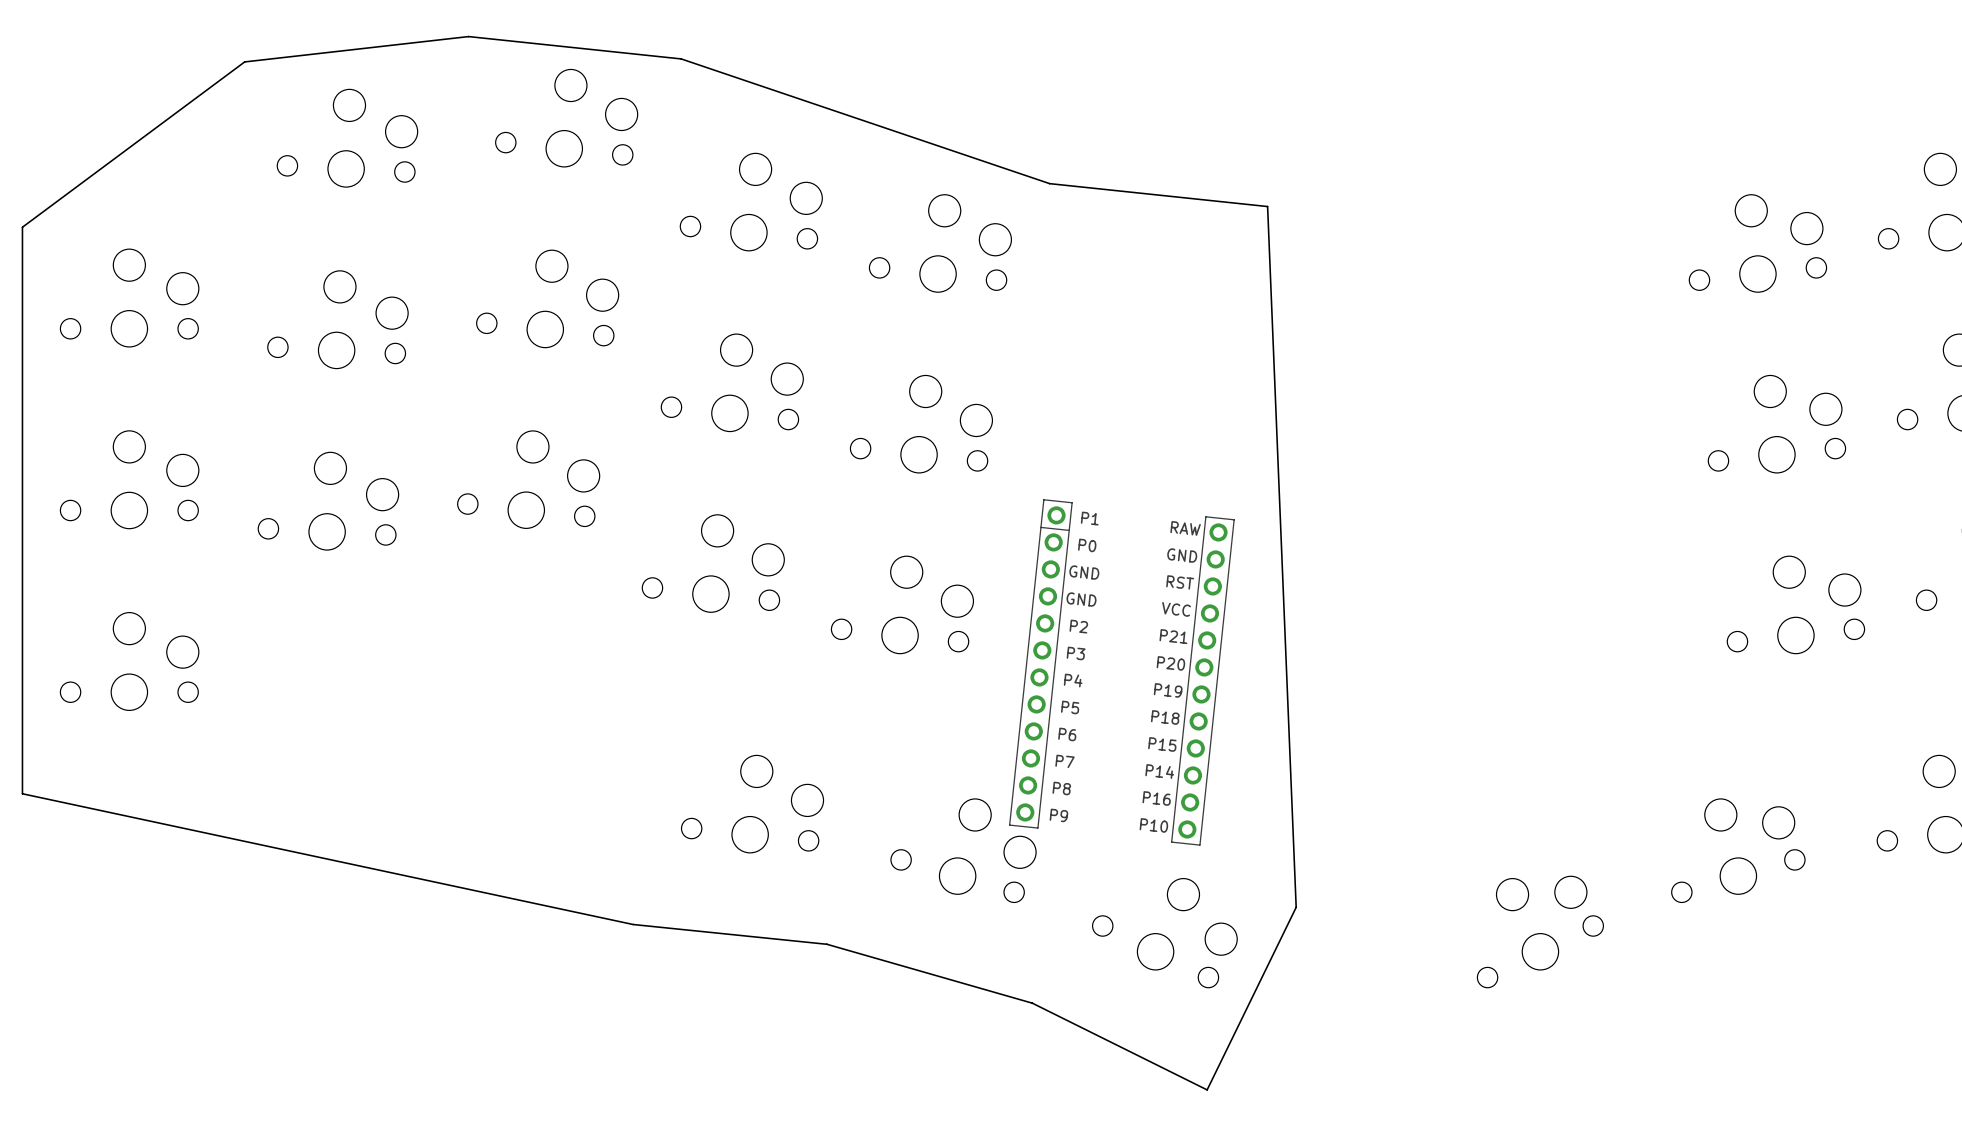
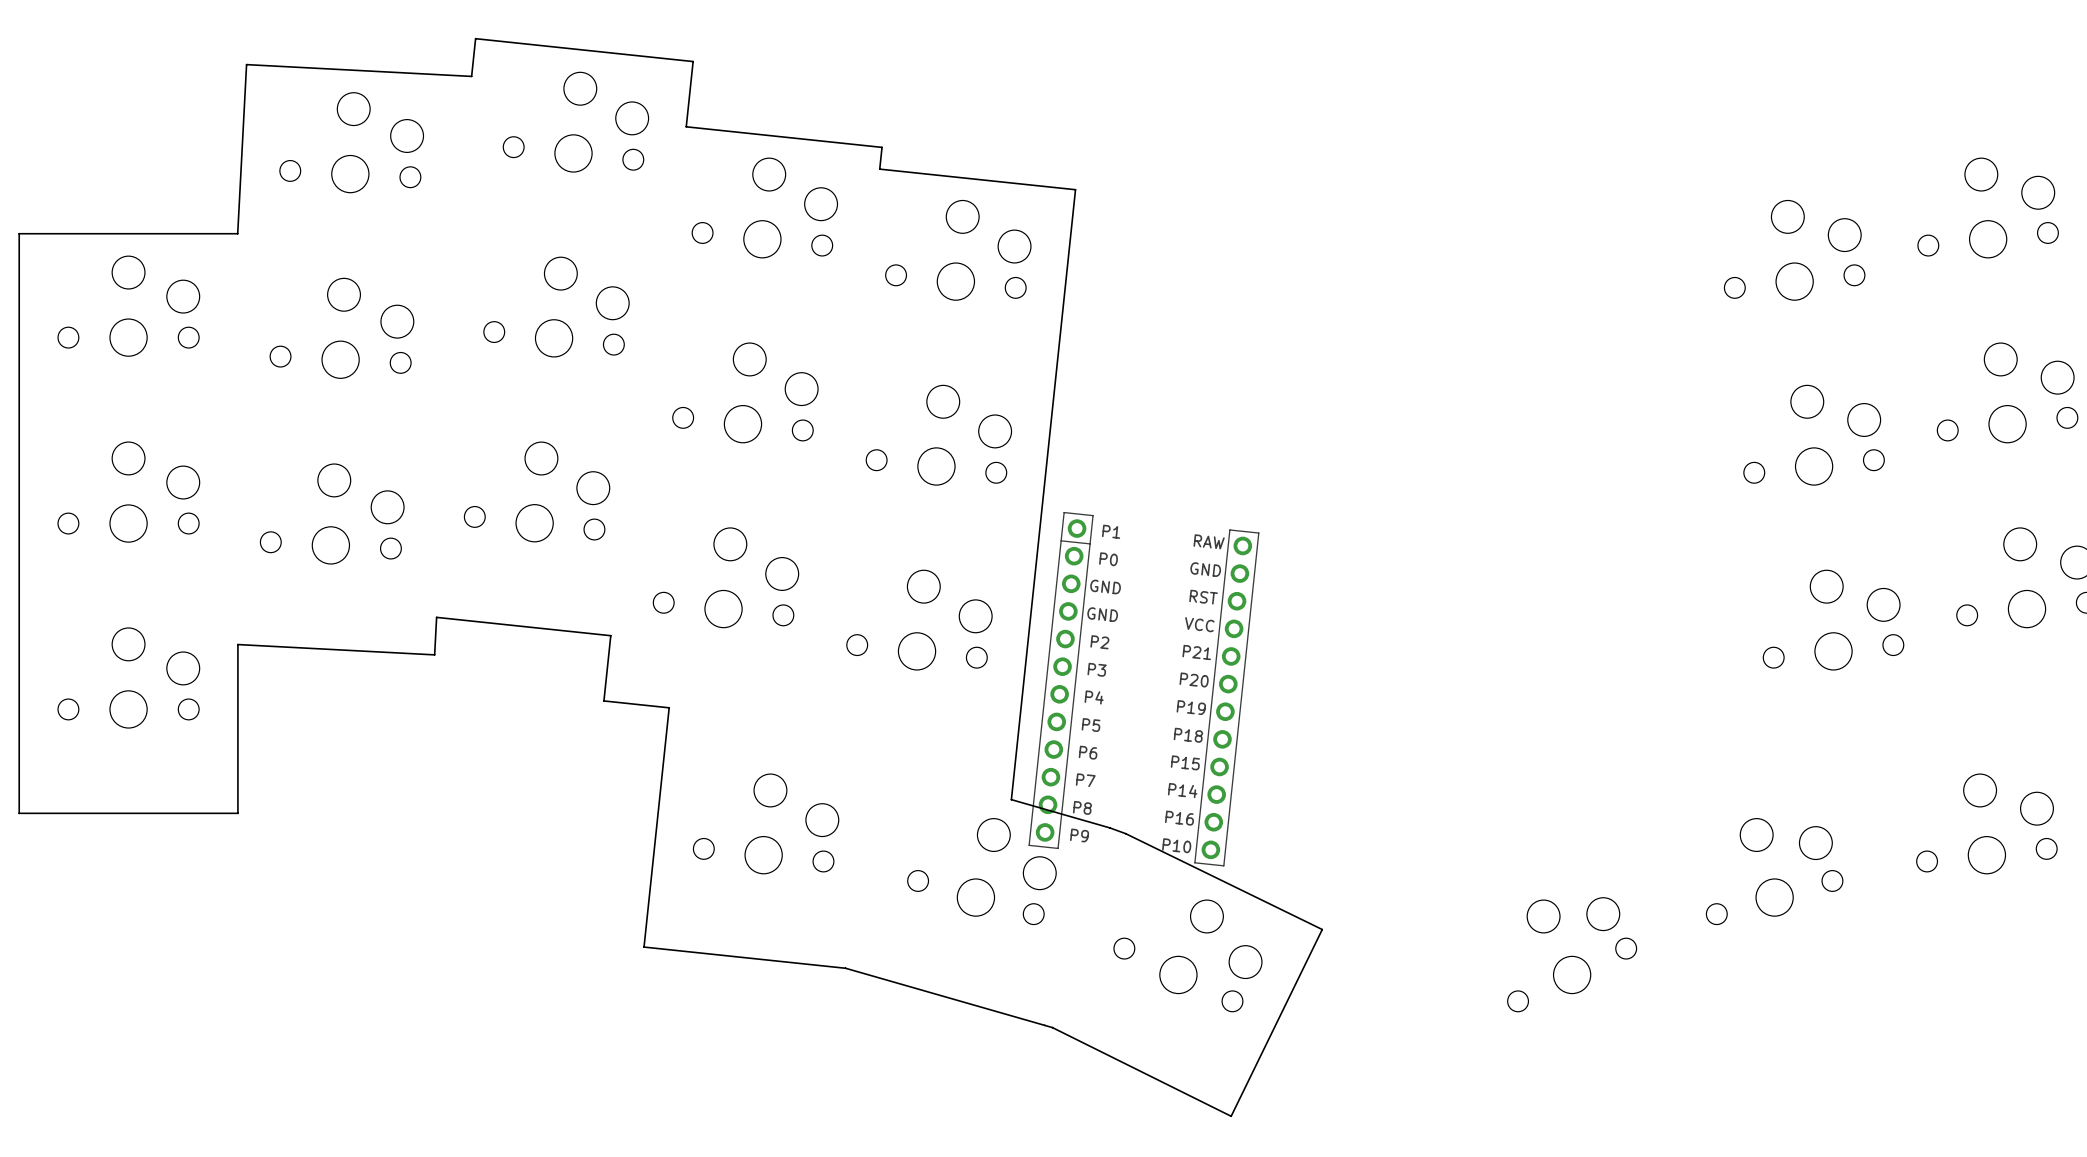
board edge: (468, 36) (244, 61) (22, 227) -> (475, 38) (471, 76) (246, 64) (237, 233) (19, 233)
board edge: (681, 58) (1049, 183) -> (693, 61) (686, 126) (882, 147) (879, 169) (1070, 189)
board edge: (1054, 184) (1267, 206) (1296, 907) -> (1075, 189) (1011, 799) (1125, 833) (1322, 929)
board edge: (22, 793) (633, 924) (830, 945) -> (19, 813) (237, 813) (237, 644) (434, 654) (436, 617) (610, 635) (603, 700) (669, 707) (644, 947) (845, 968)

